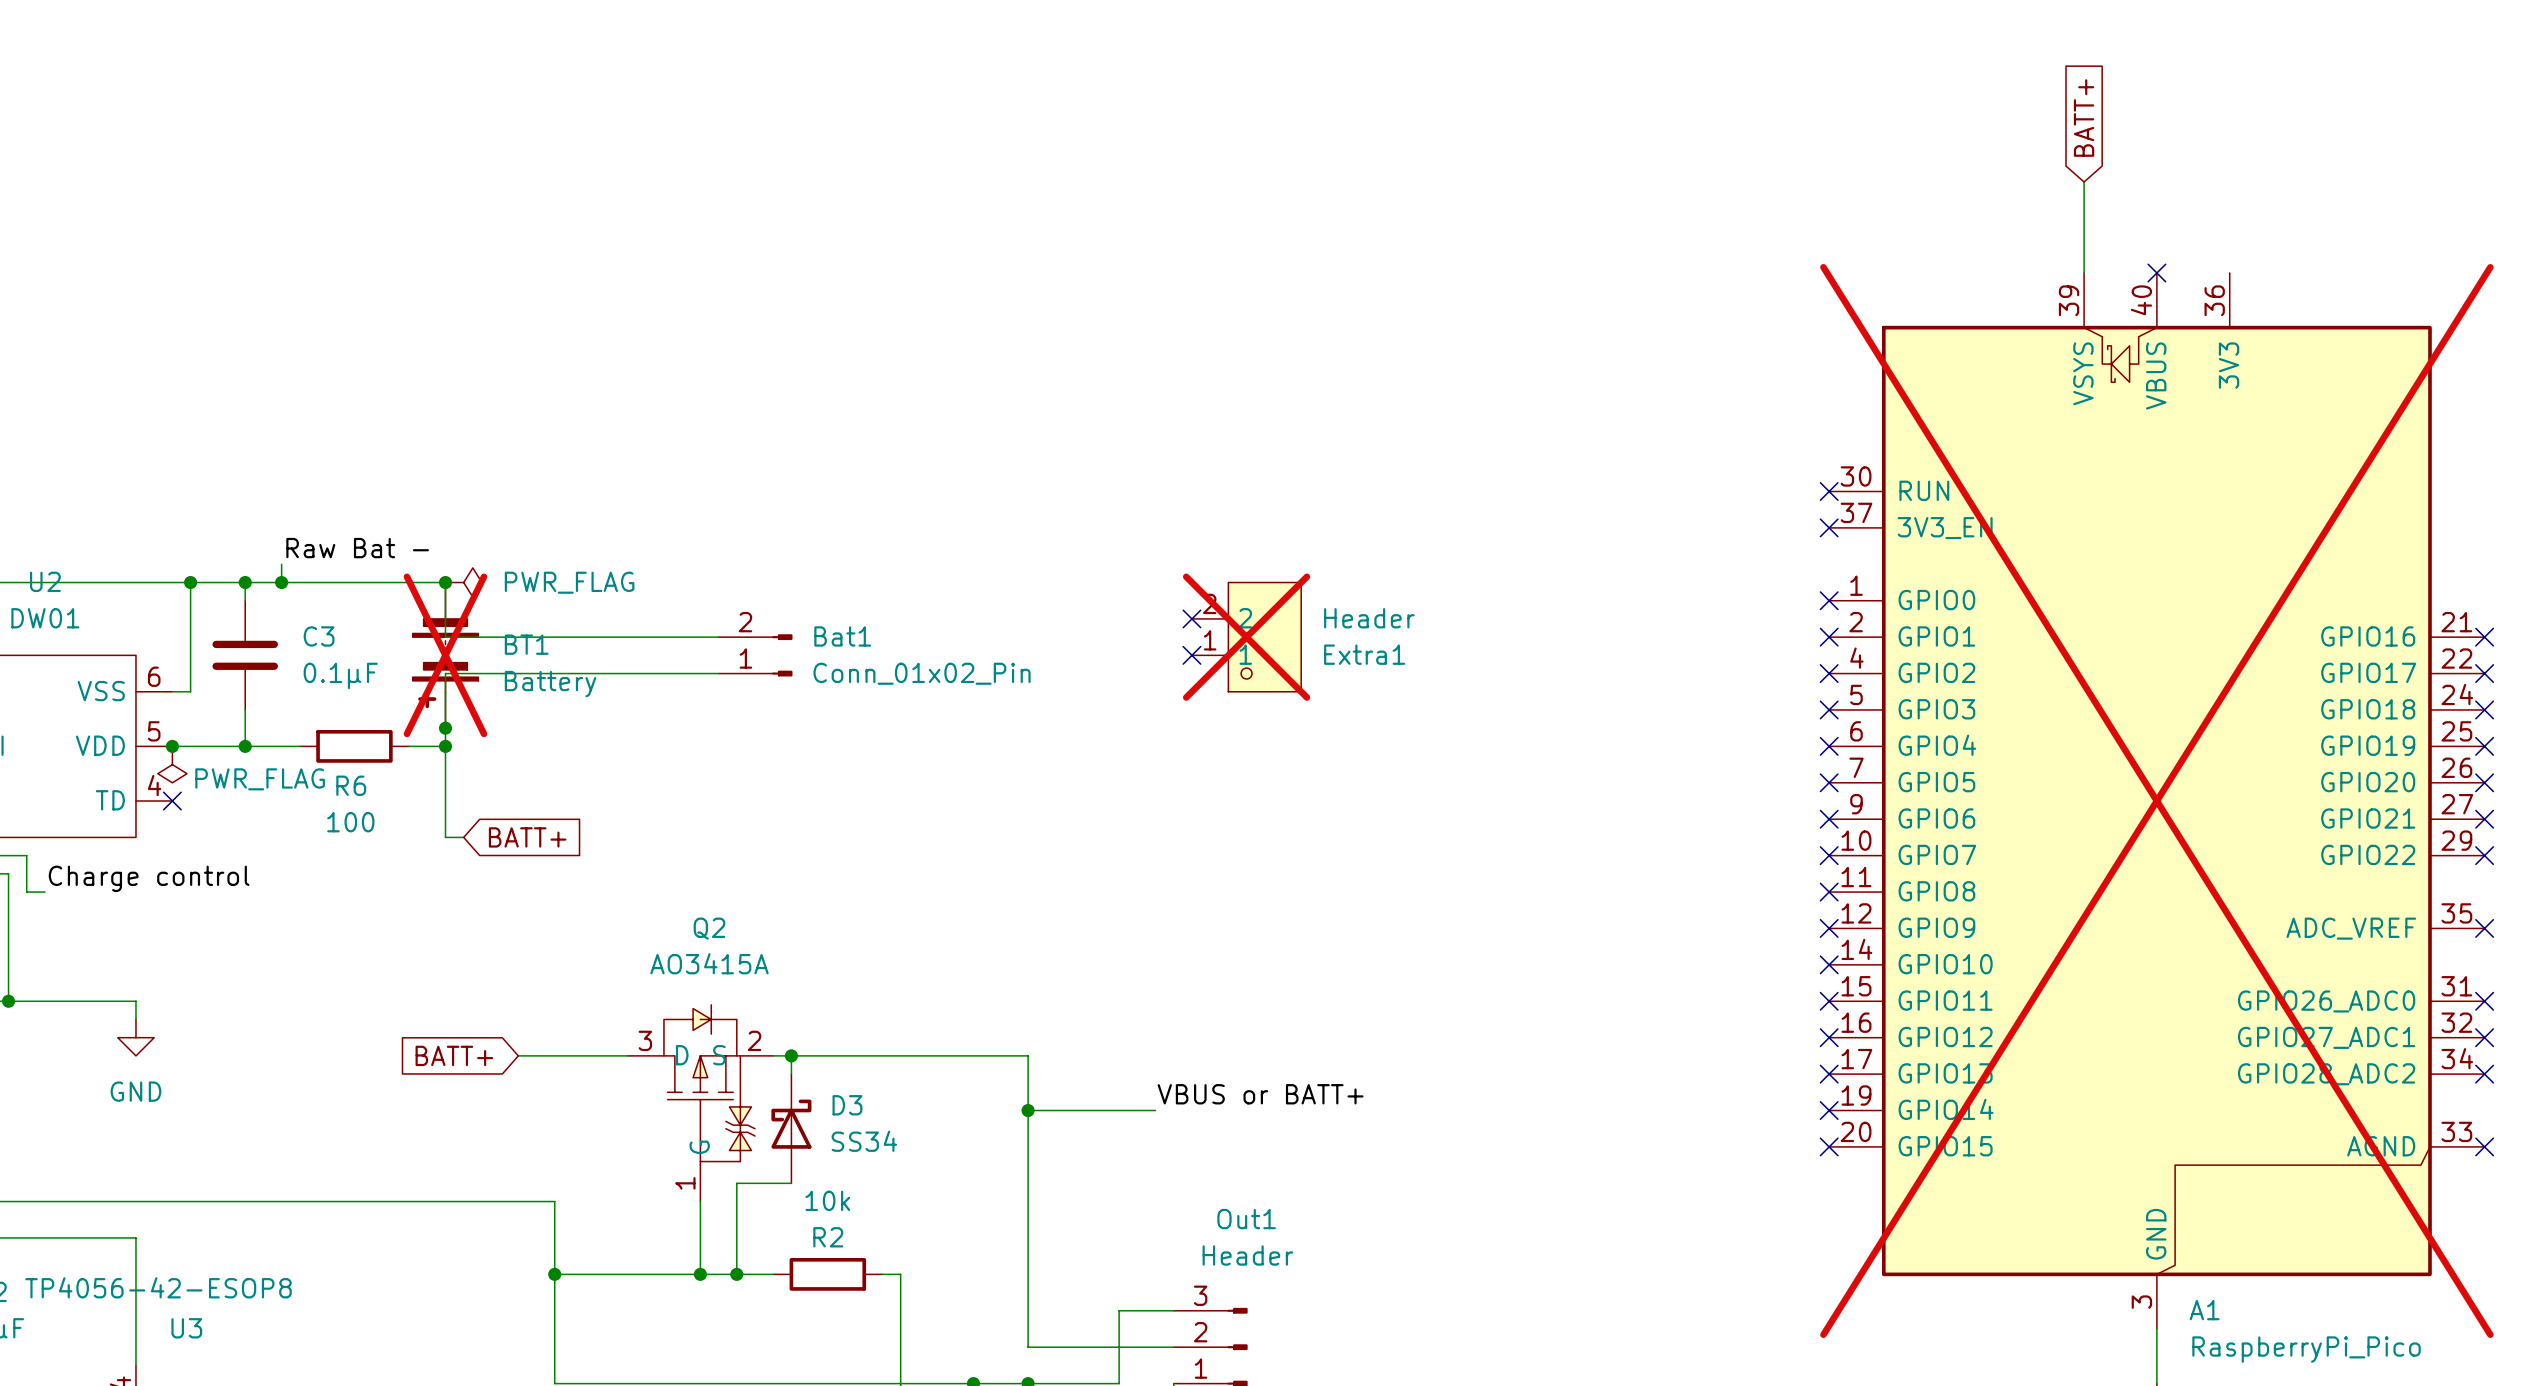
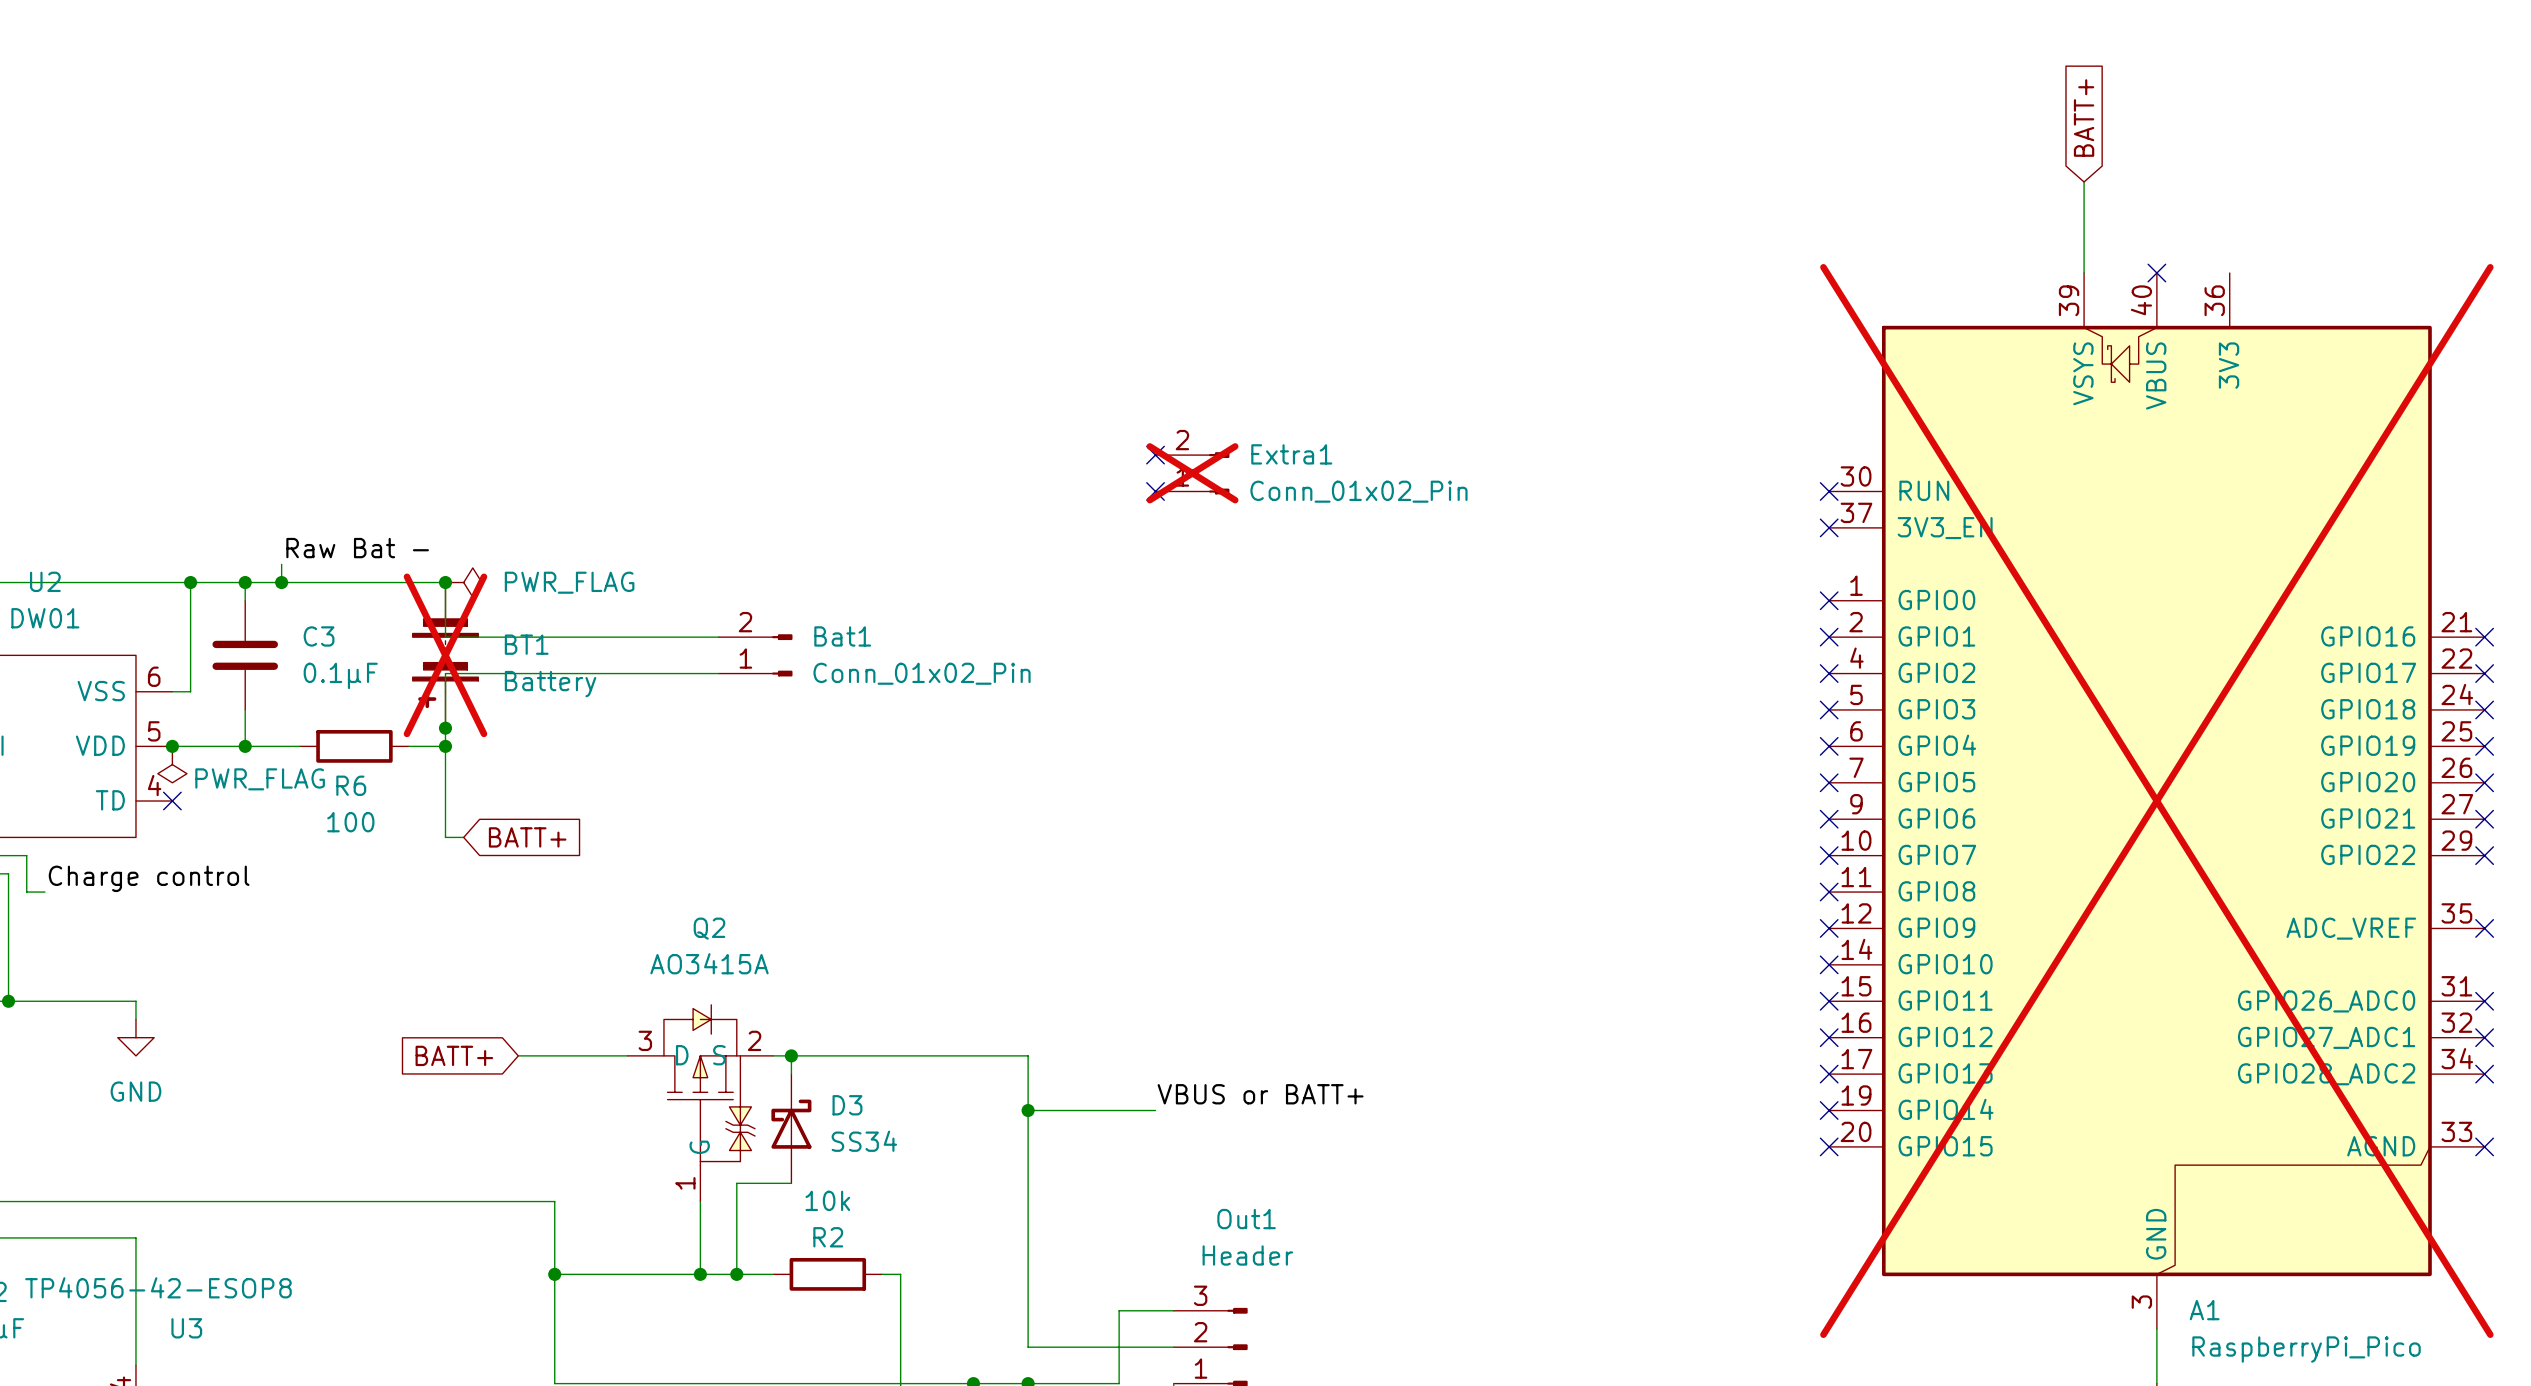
no-connect mark: none -> (1155, 455)
no-connect mark: none -> (1155, 491)
Extra1 symbol: [1191, 582, 1302, 692] -> [1155, 452, 1230, 495]
no-connect mark: (1191, 618) -> none
Extra1 value: Header (1369, 618) -> Conn_01x02_Pin (1358, 491)
Extra1 name position: Extra1 (1364, 654) -> Extra1 (1291, 454)
no-connect mark: (1191, 655) -> none

